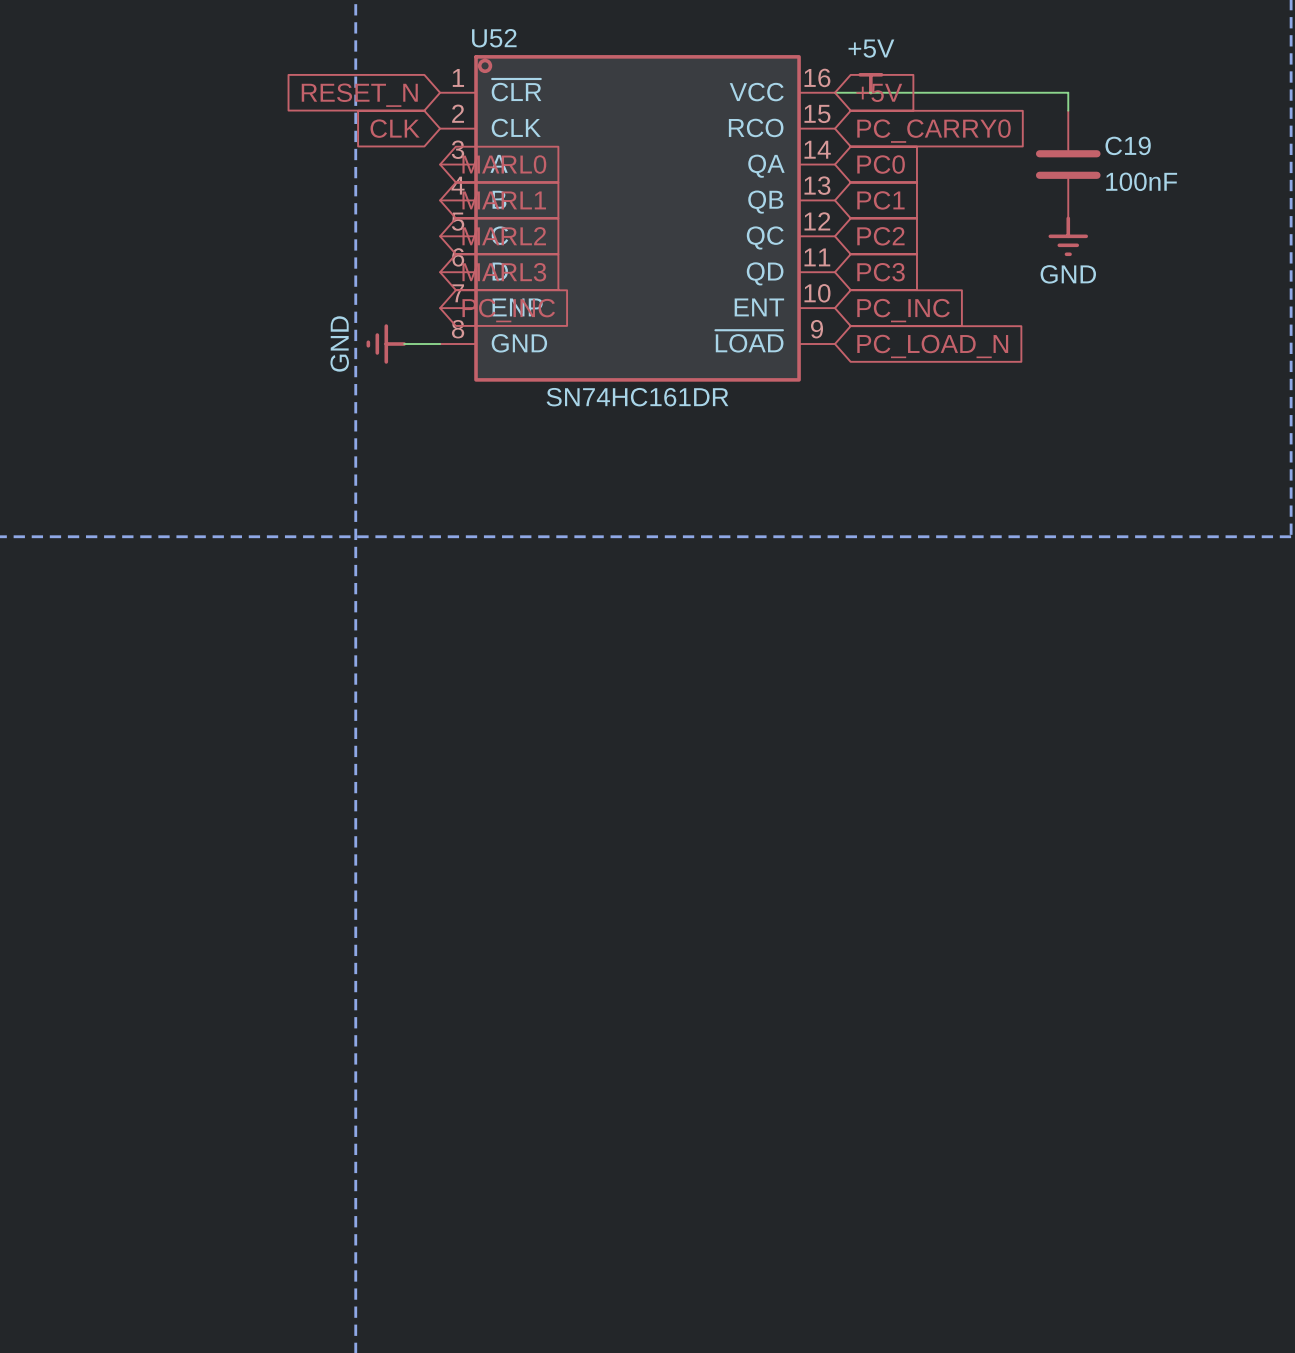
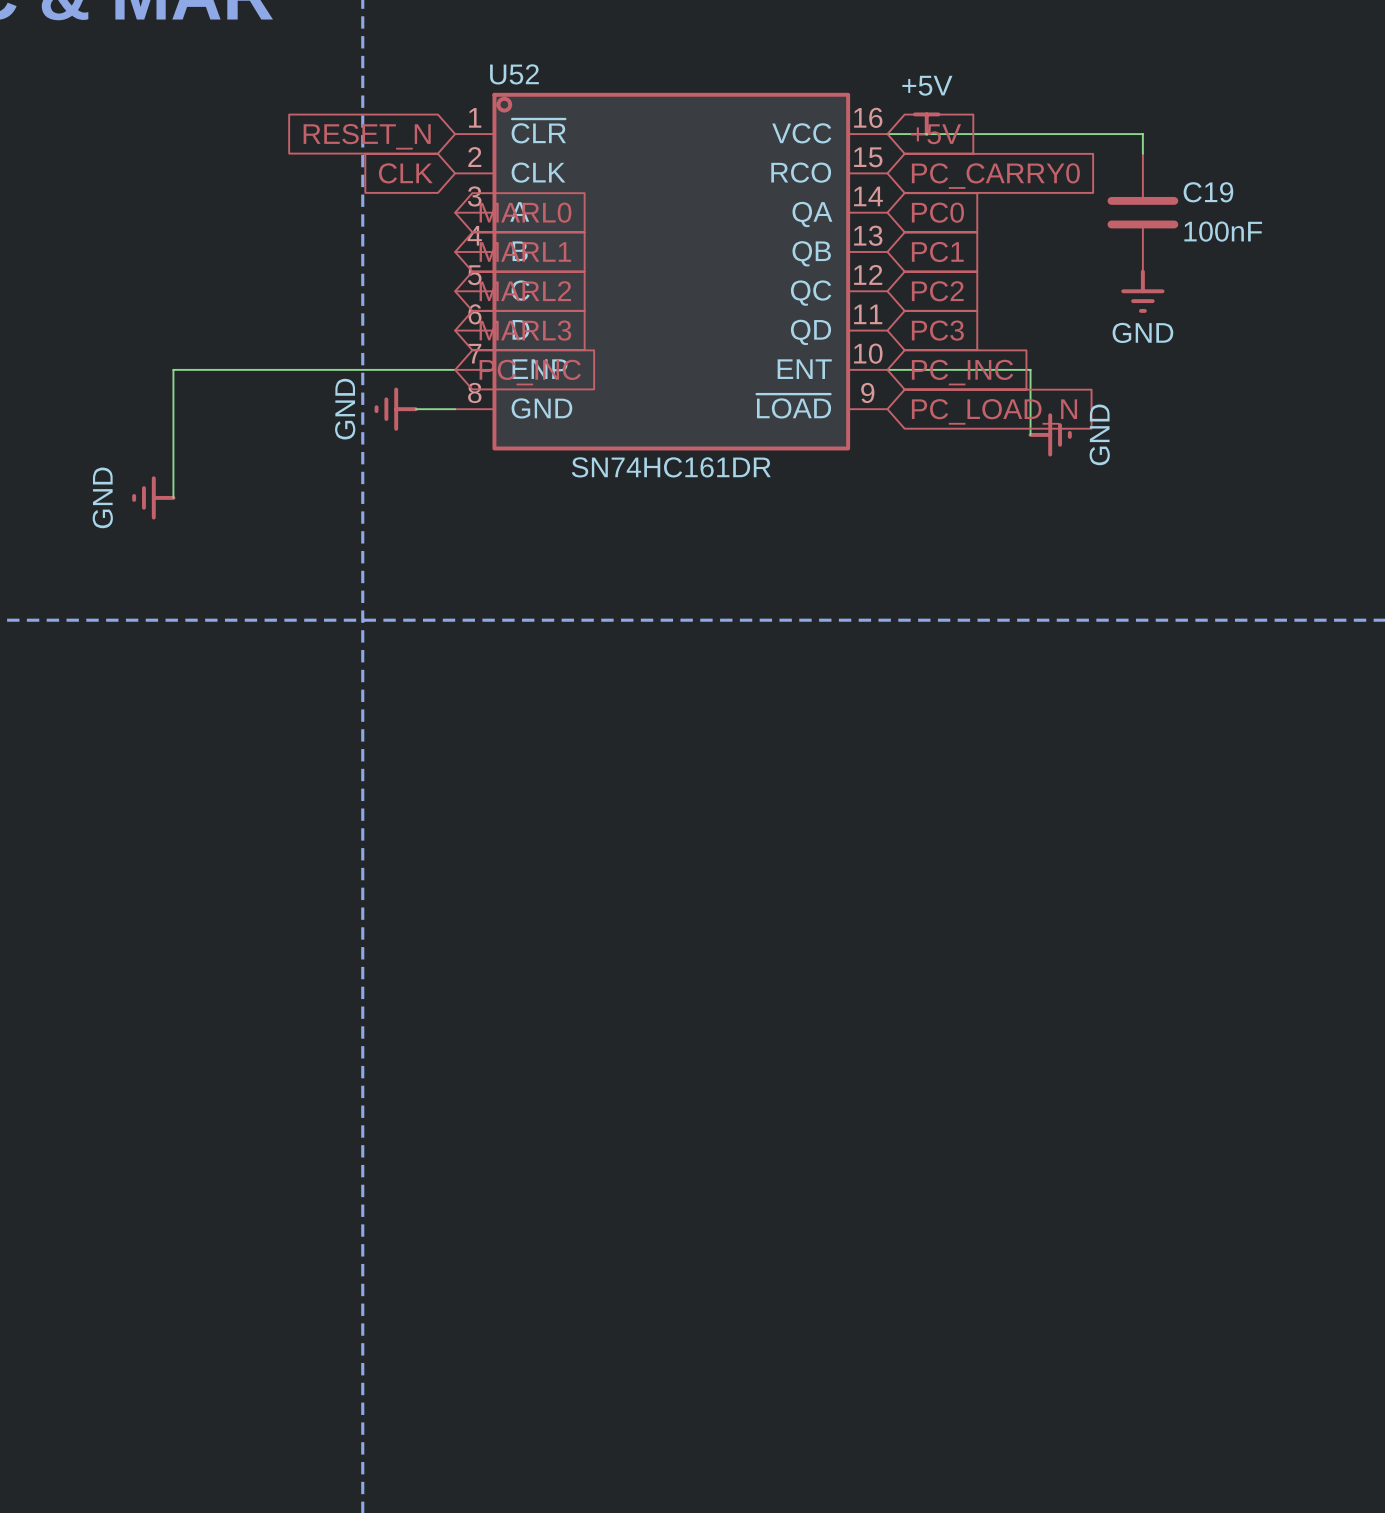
wire: none -> (455, 369) (173, 369) (173, 497)
wire: none -> (887, 369) (1030, 369) (1030, 434)
power symbol: none -> GND (1050, 434)
power symbol: none -> GND (153, 497)

